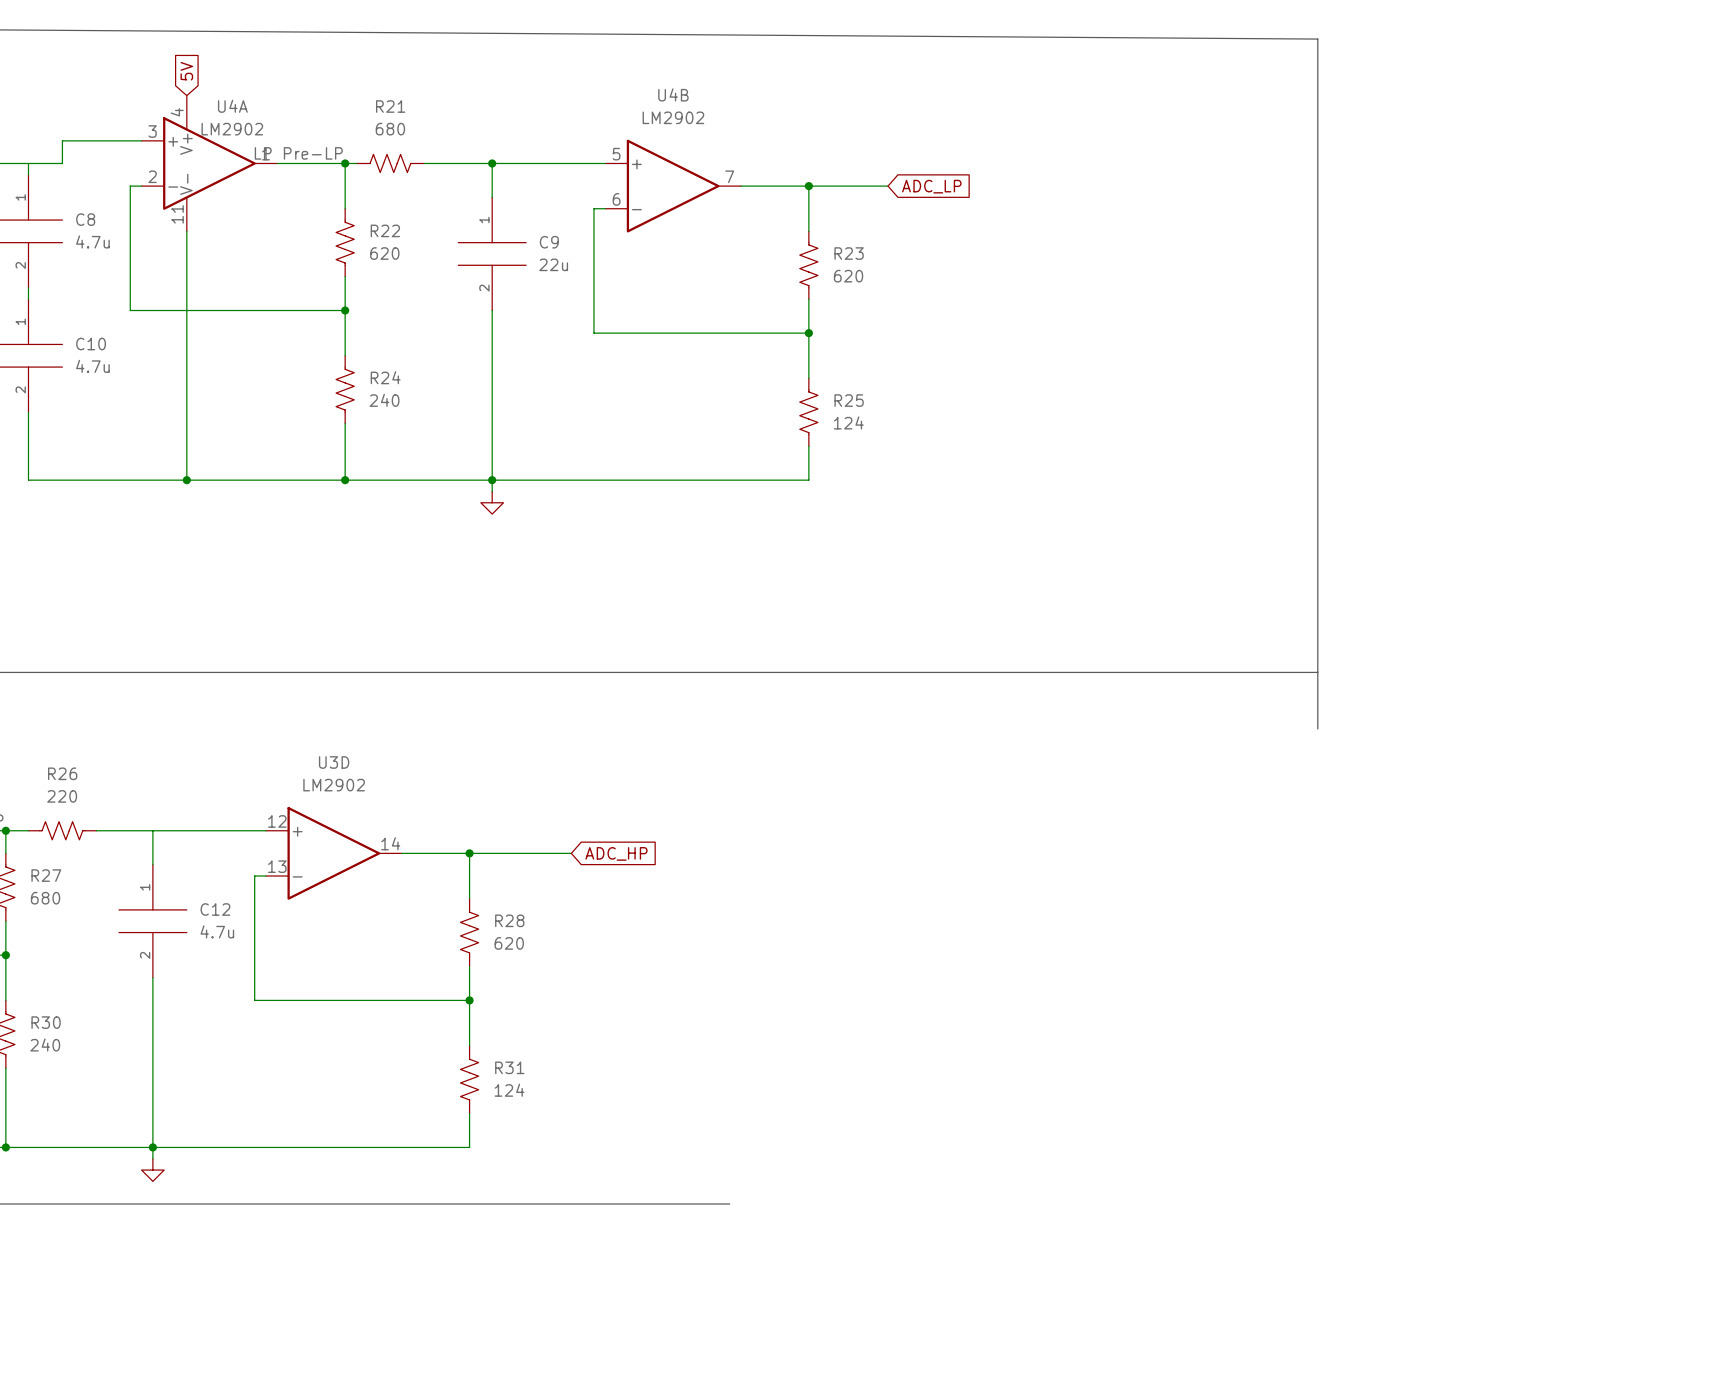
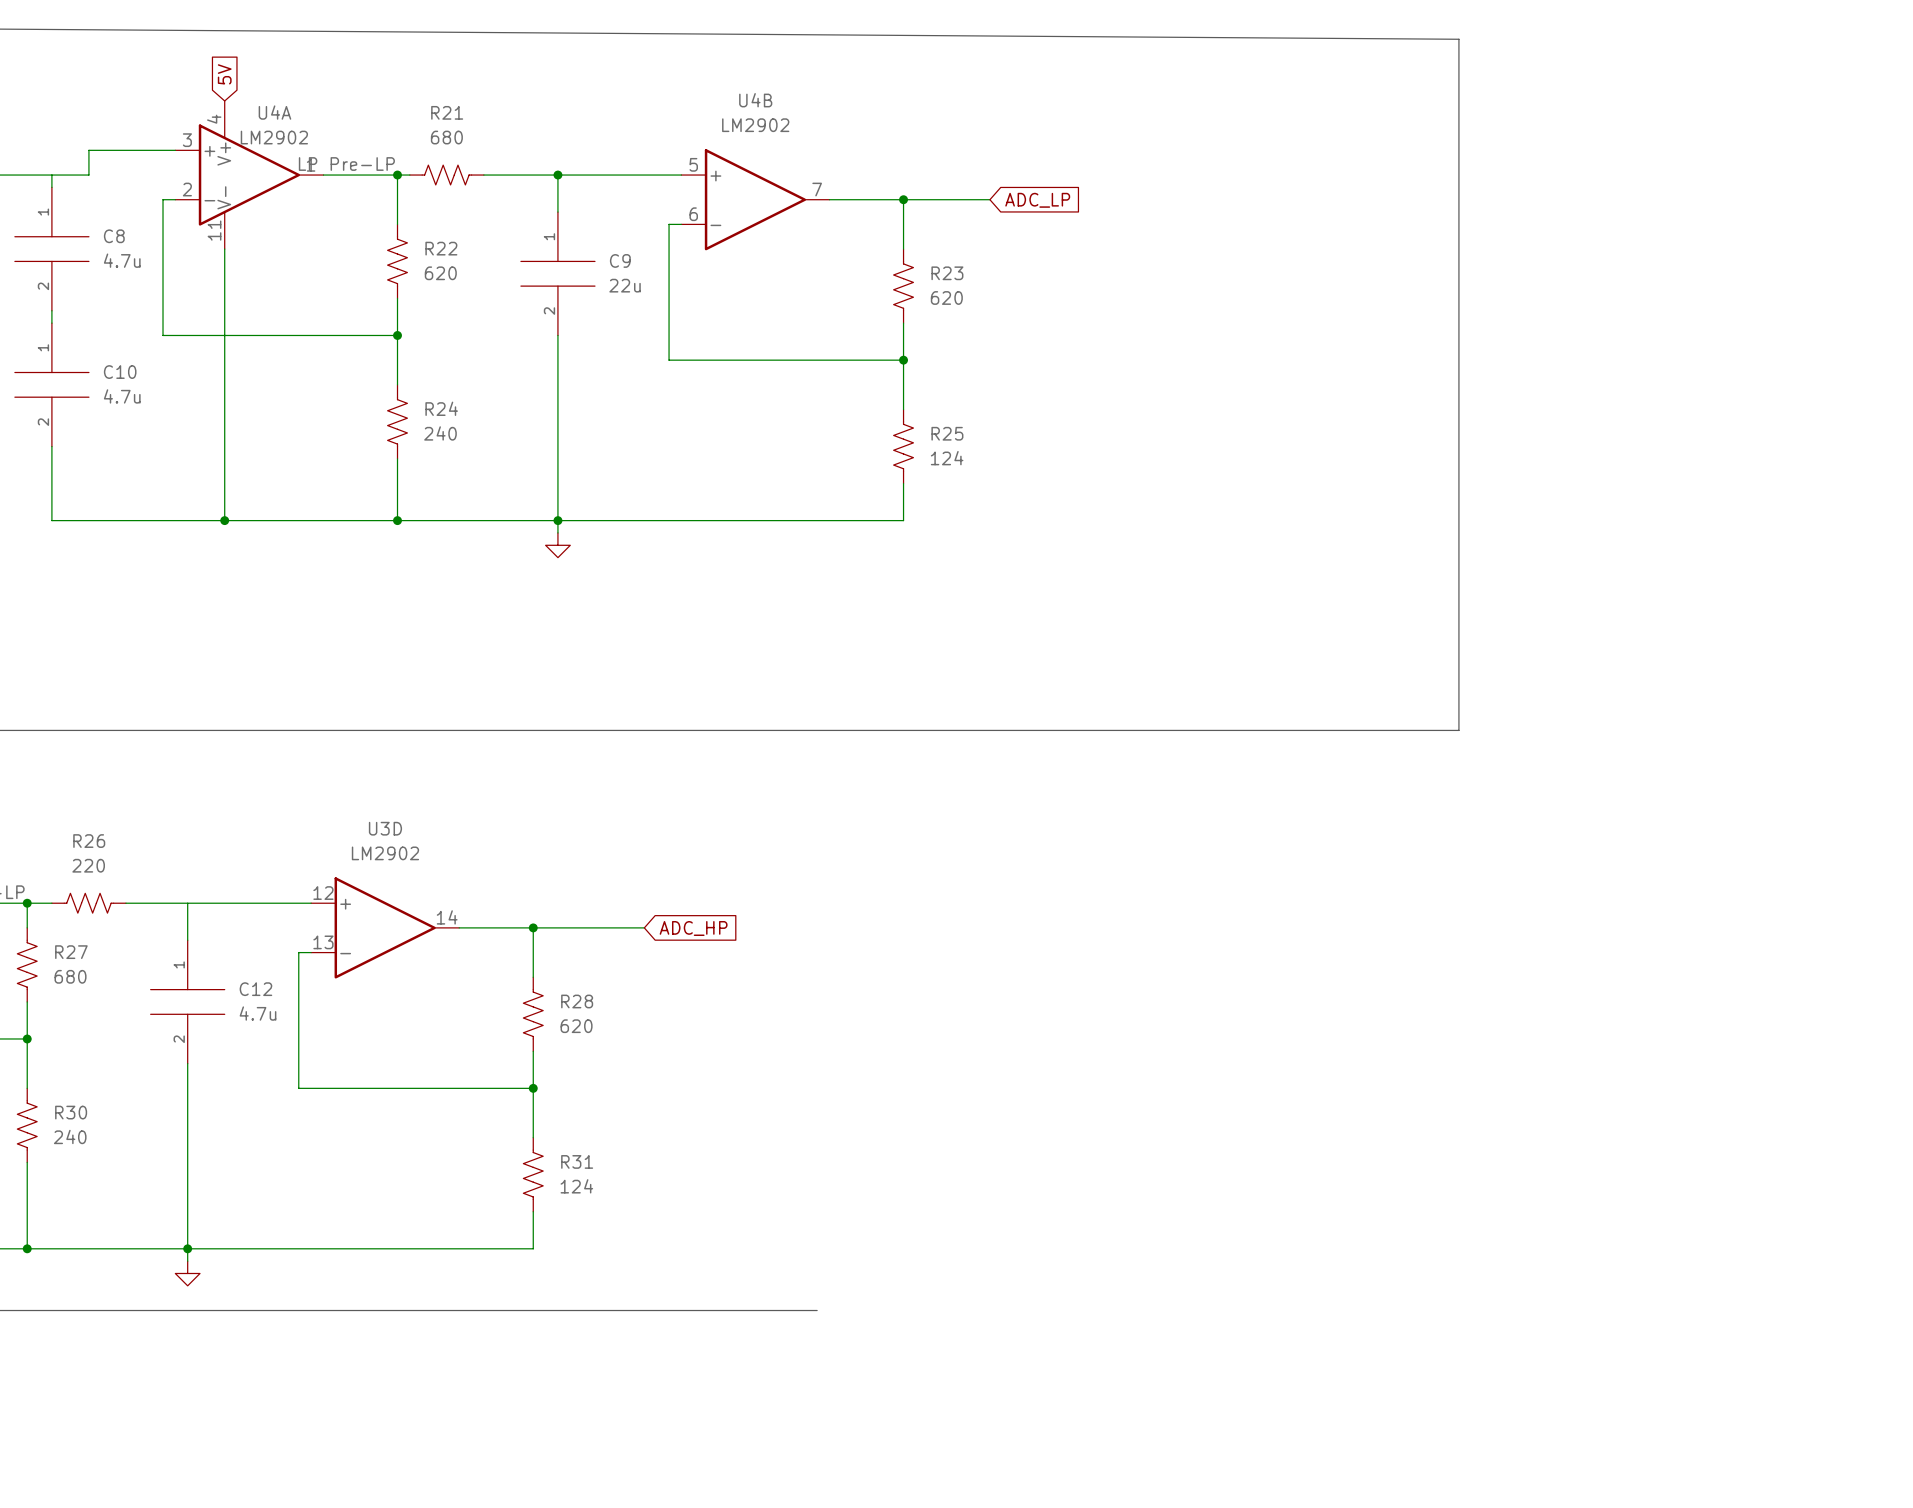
line: (1317, 672) (1317, 728) -> none

